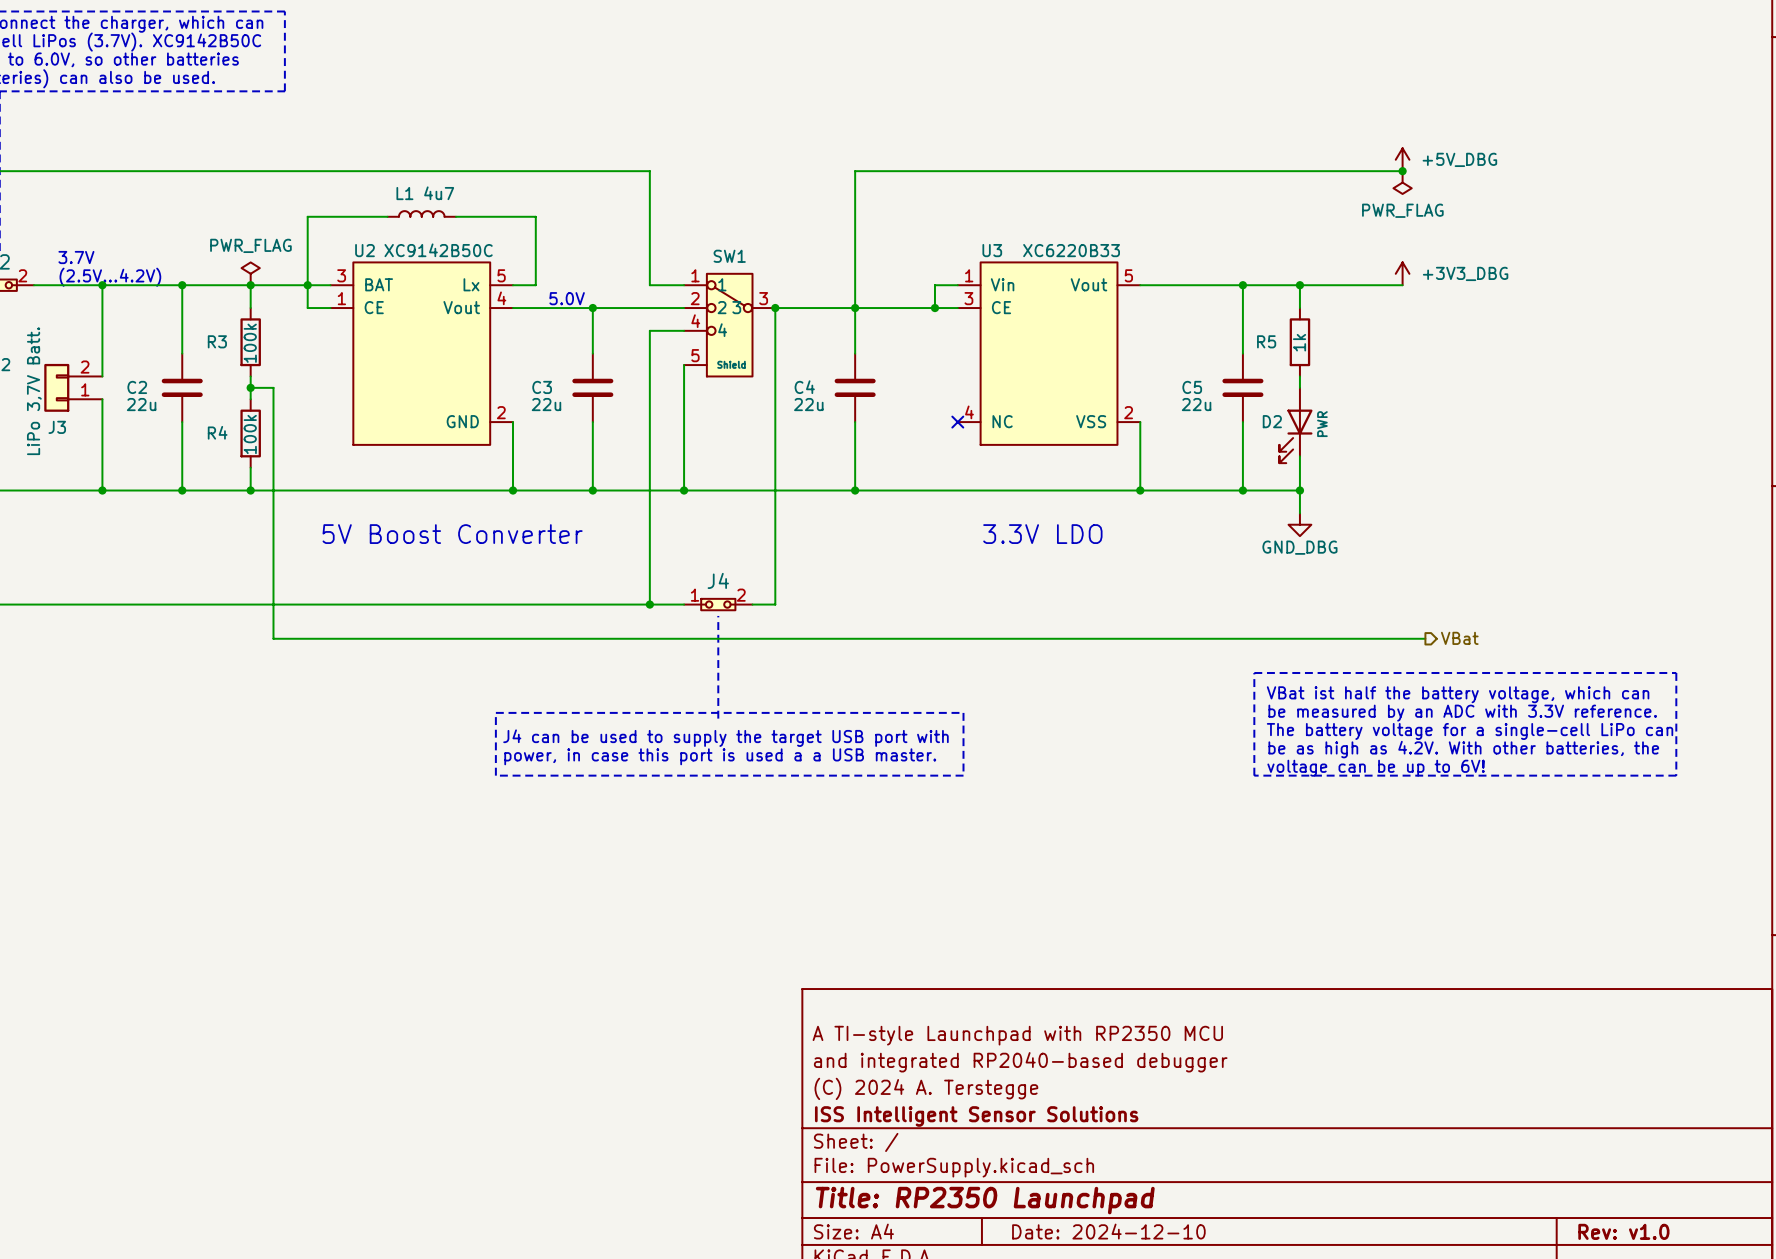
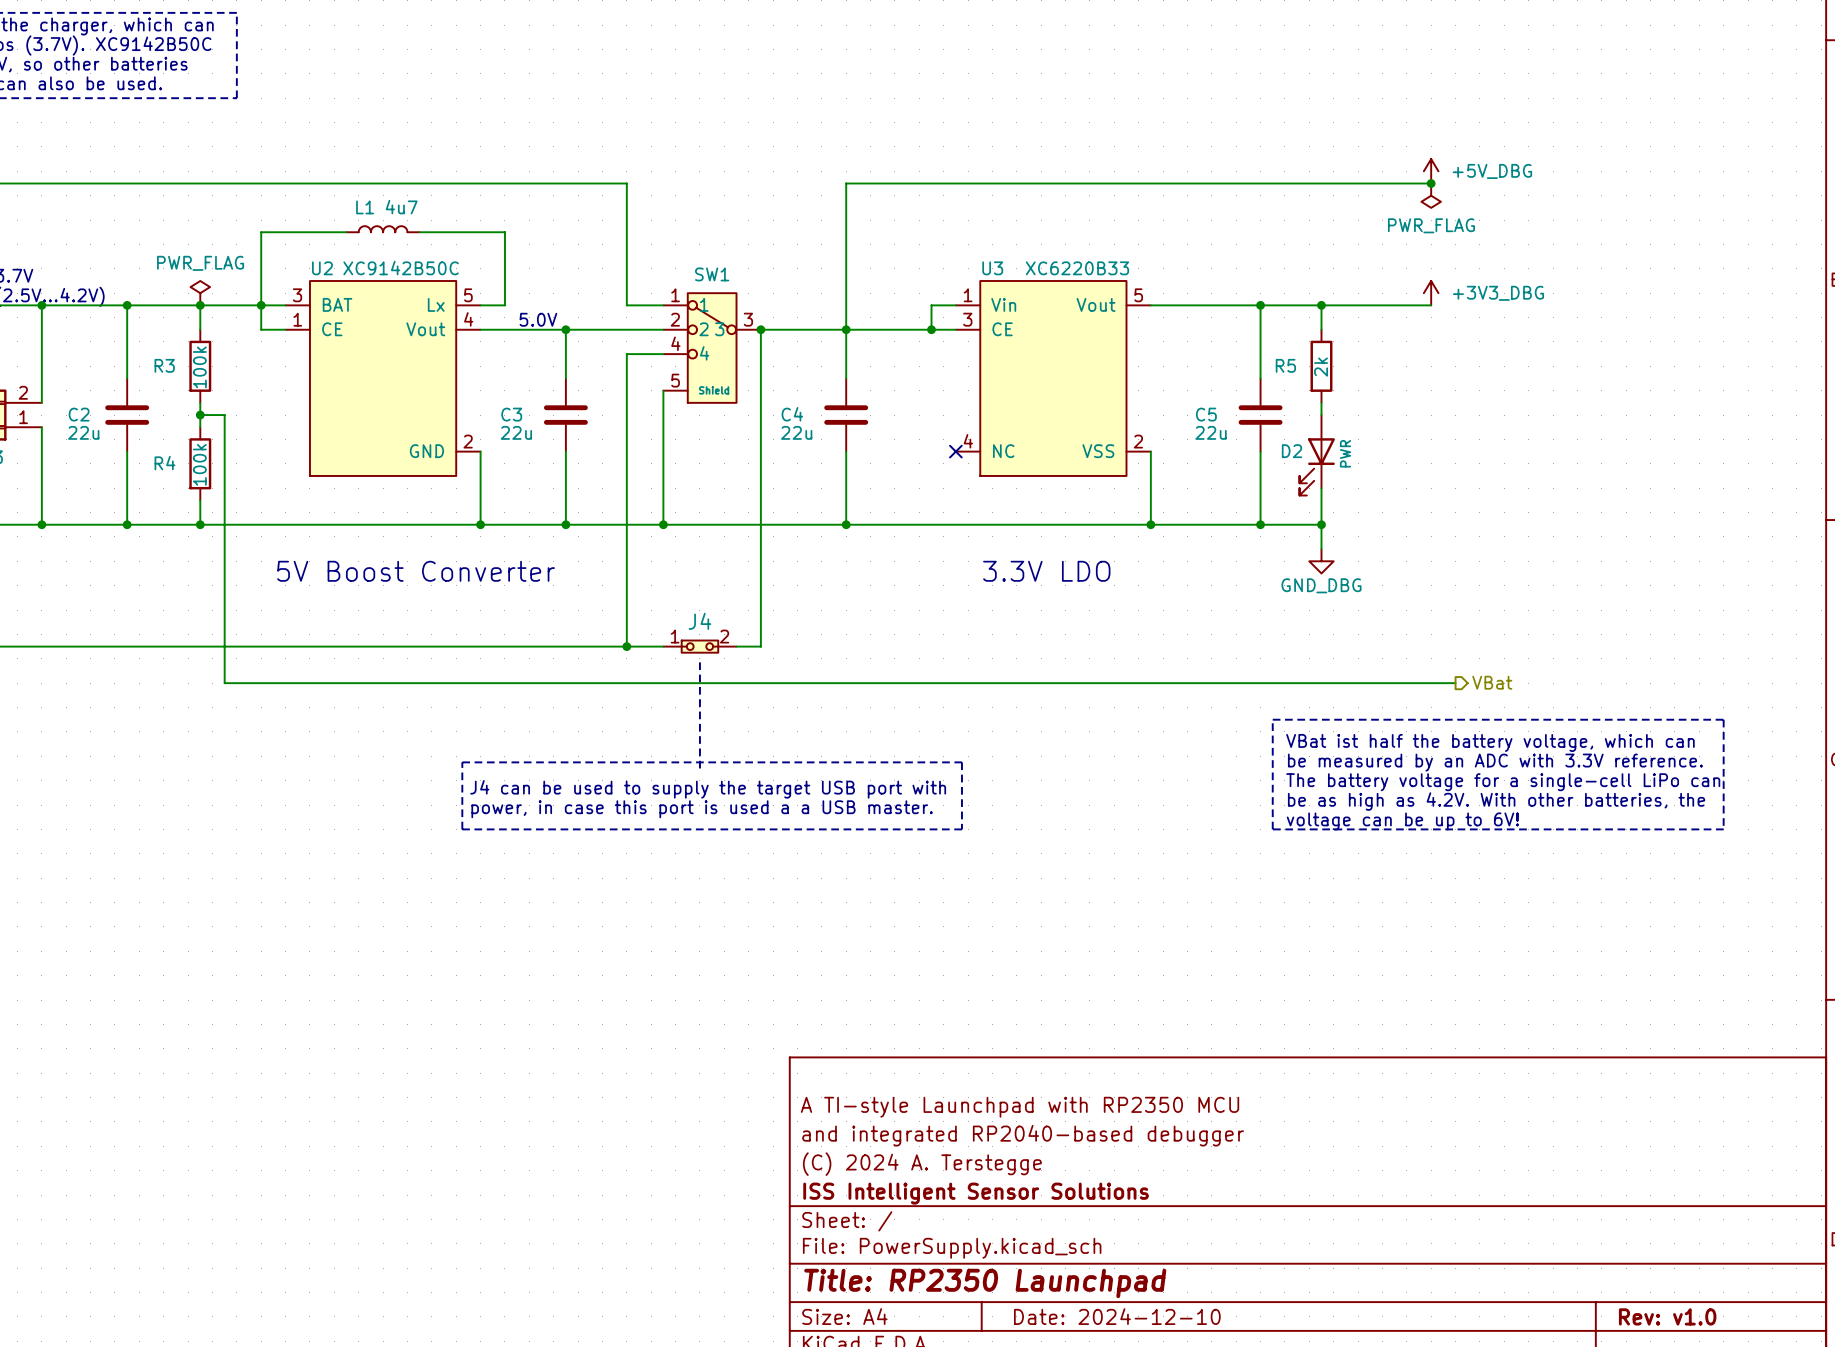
R5 value: 1k (1299, 342) -> 2k (1321, 367)

